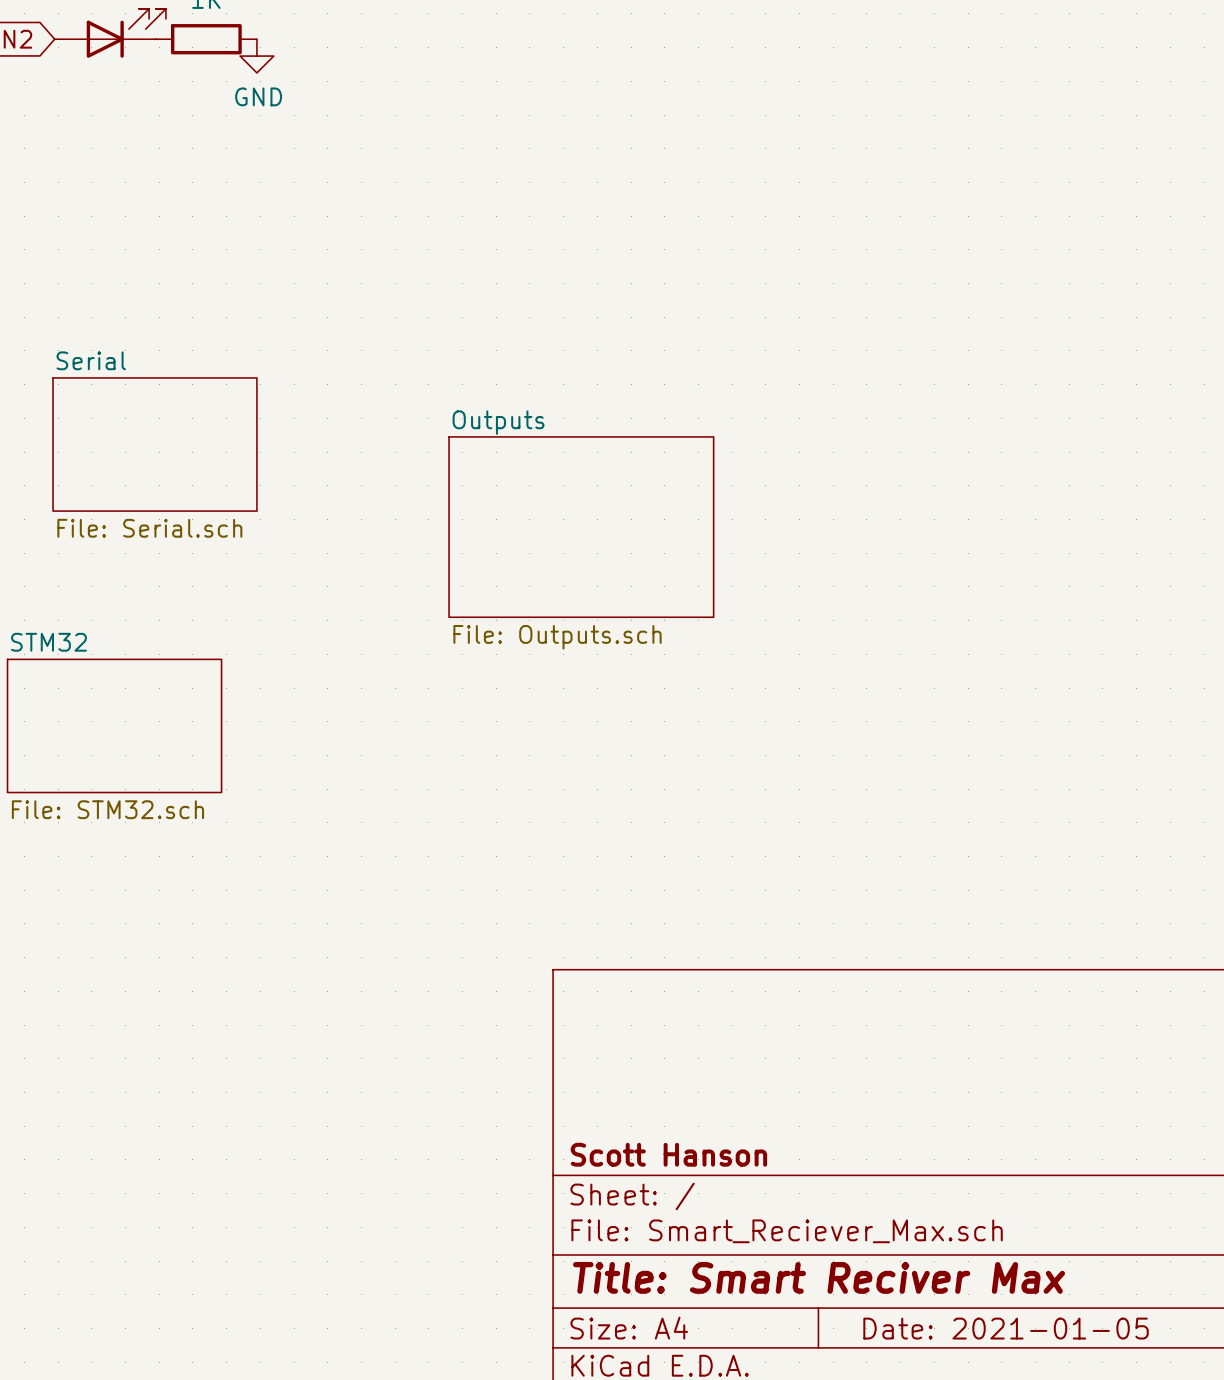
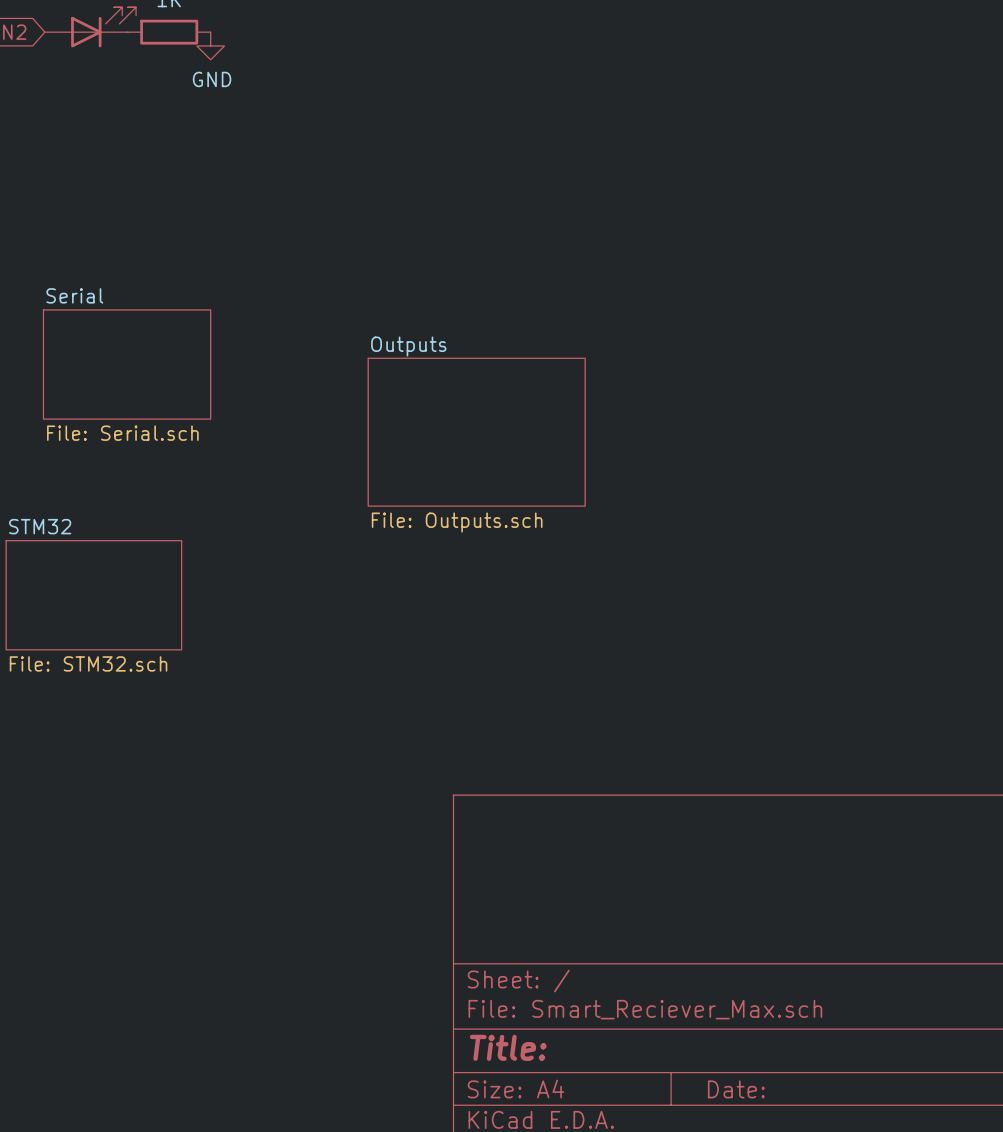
title block: Scott Hanson (668, 1154) -> none
title block: Title: Smart Reciver Max (819, 1277) -> Title: (508, 1047)
title block: Date: 2021-01-05 (1006, 1328) -> Date: (736, 1089)

